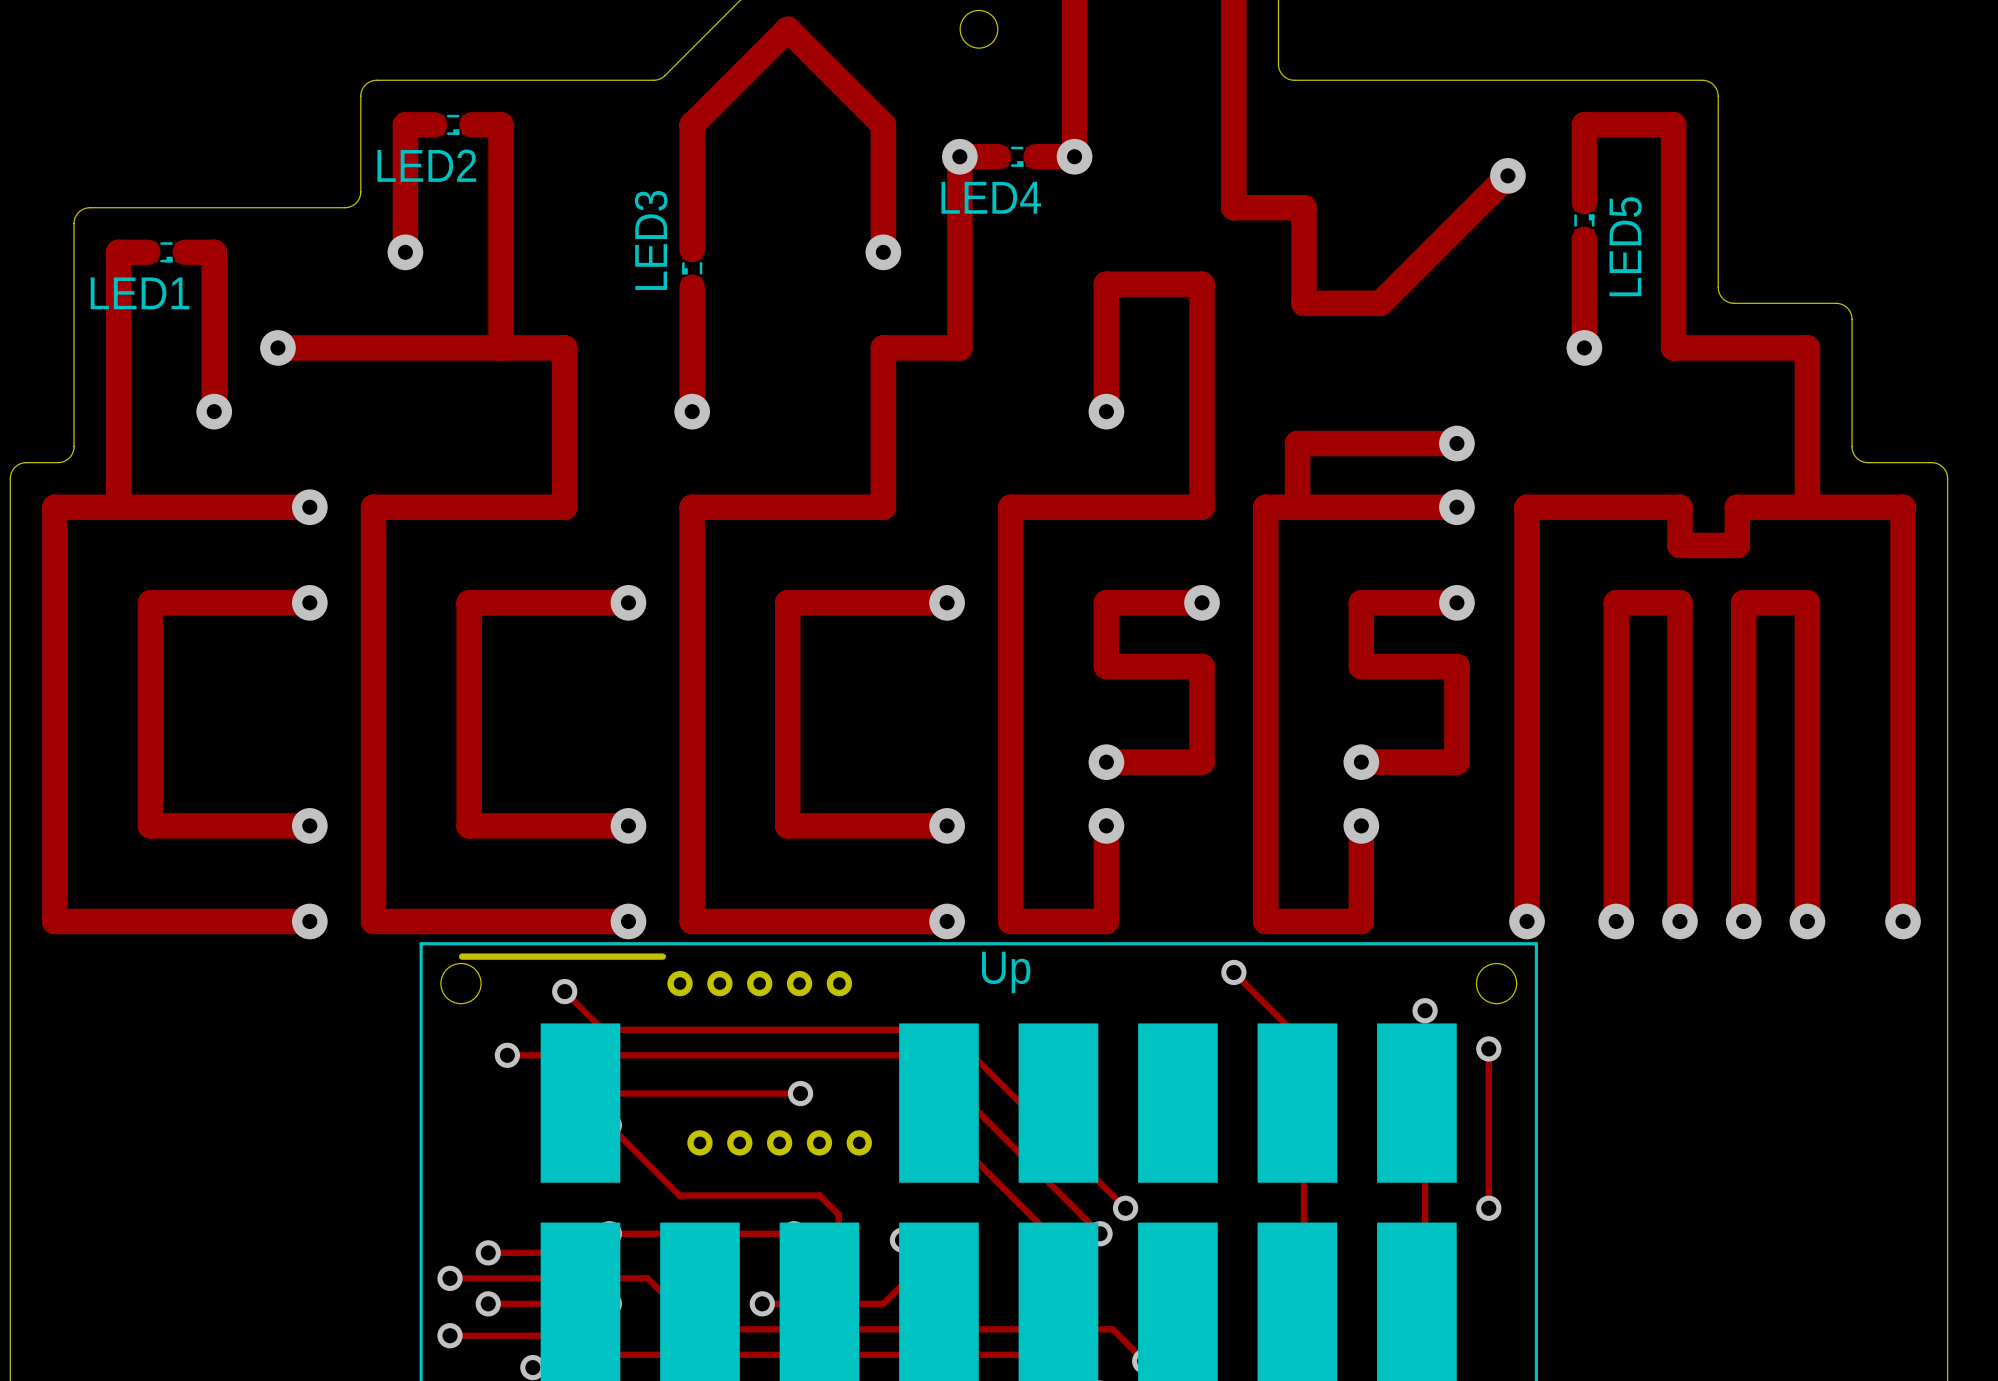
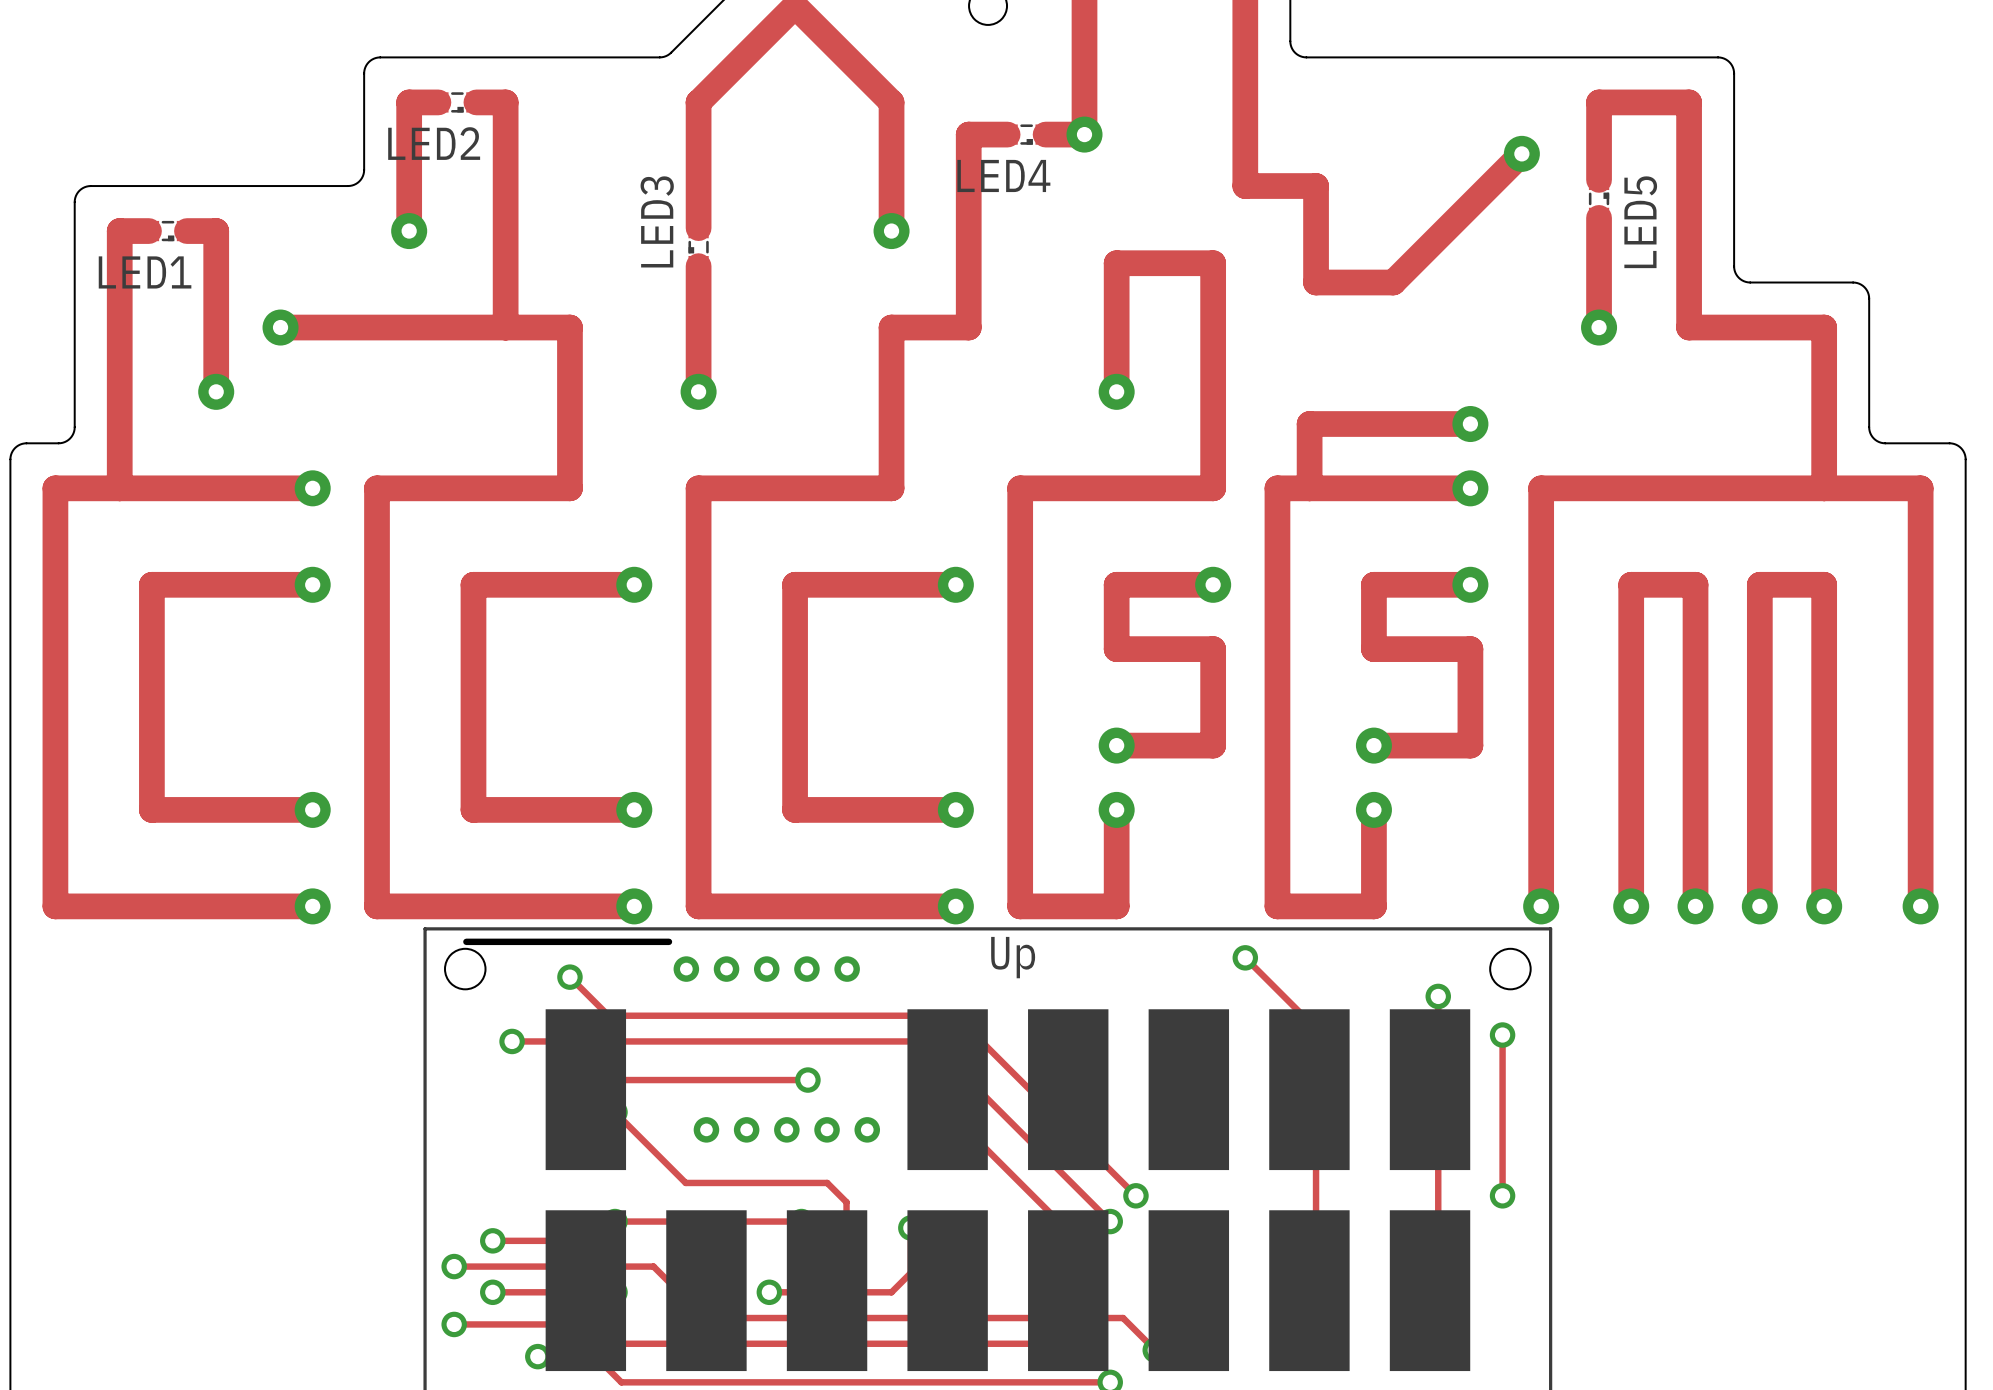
via: (959, 156) -> none
track: (1679, 507) (1679, 545) (1737, 545) (1737, 507) -> (1695, 488) (1753, 488)

